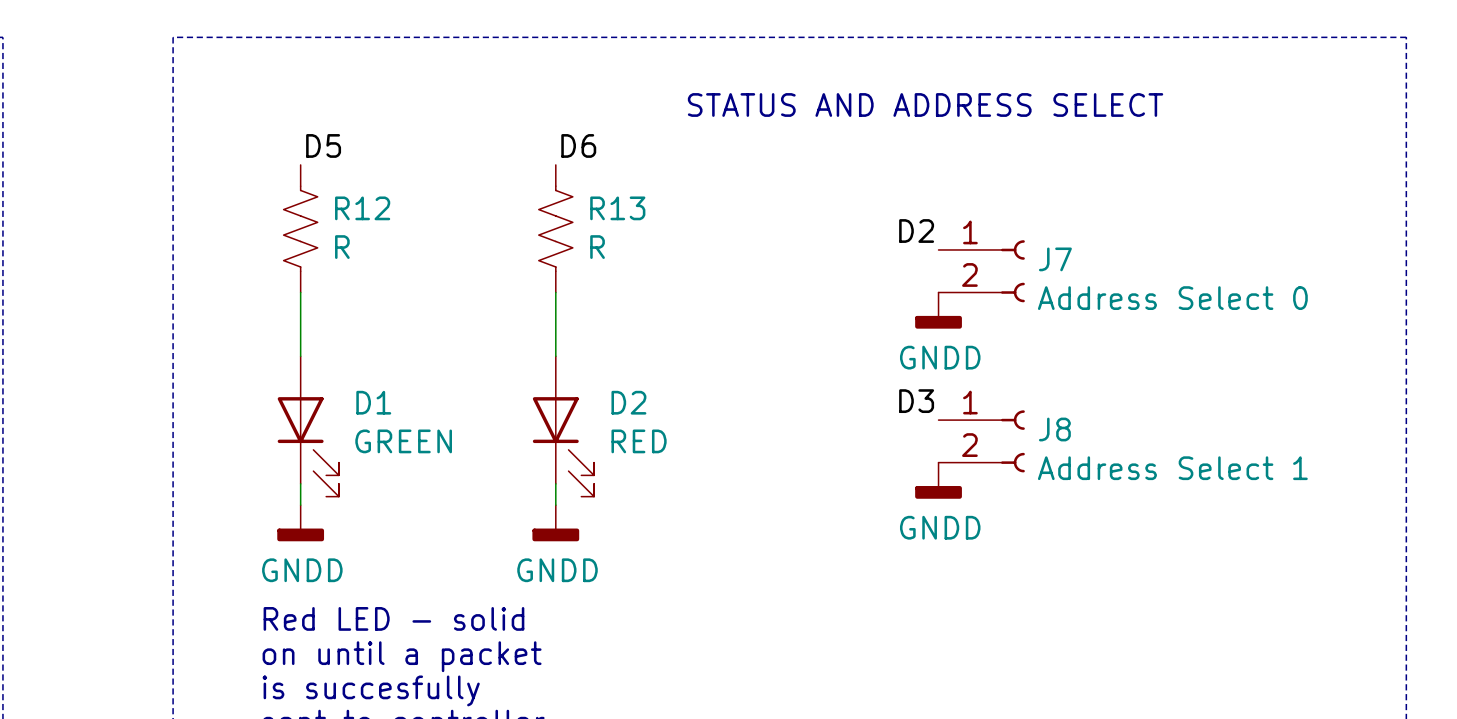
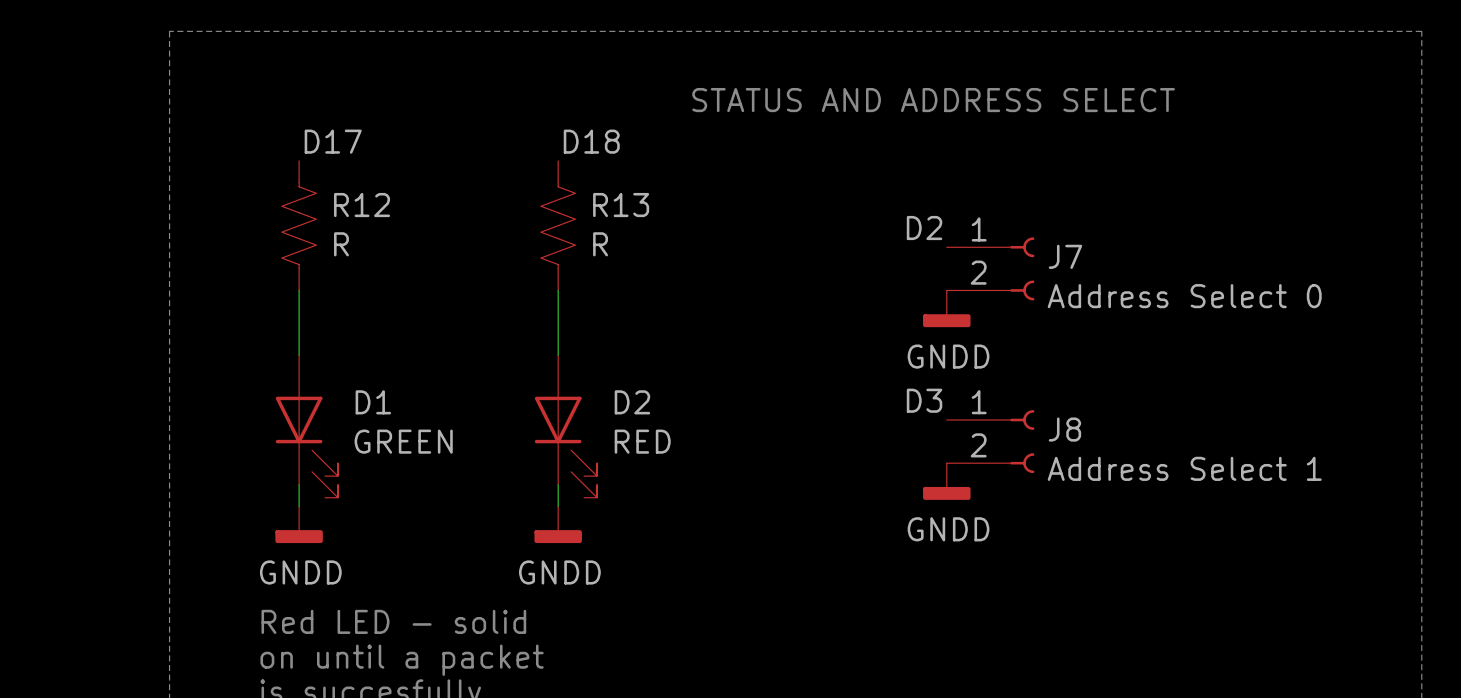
label: D5 (323, 145) -> D17 (333, 141)
label: D6 (578, 145) -> D18 (591, 141)

